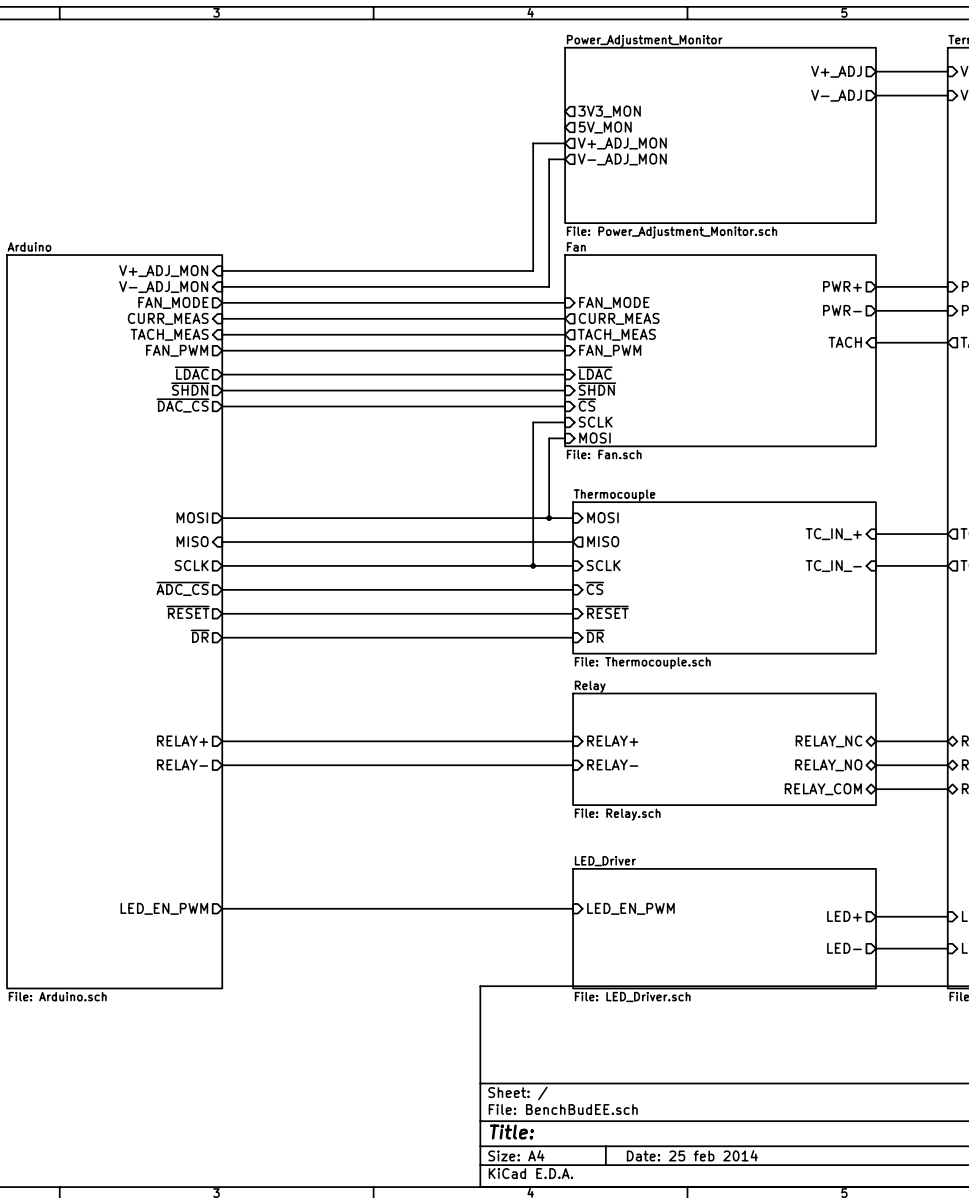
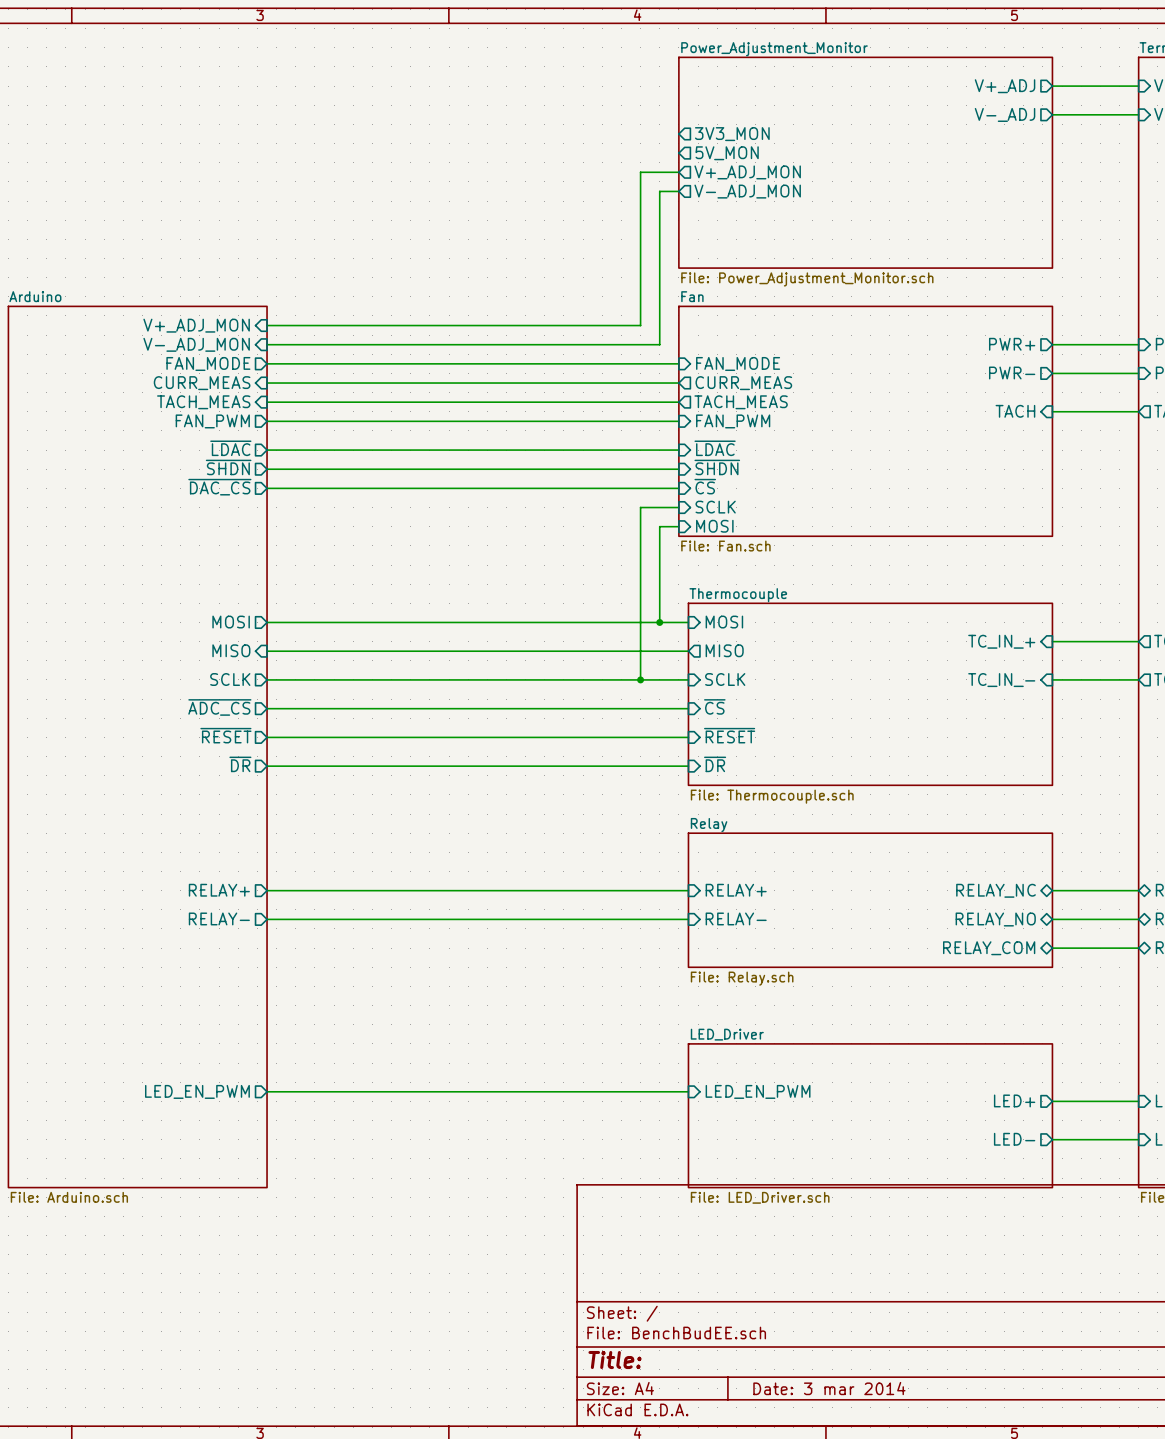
title block: Date: 25 feb 2014 (692, 1155) -> Date: 3 mar 2014 (829, 1388)

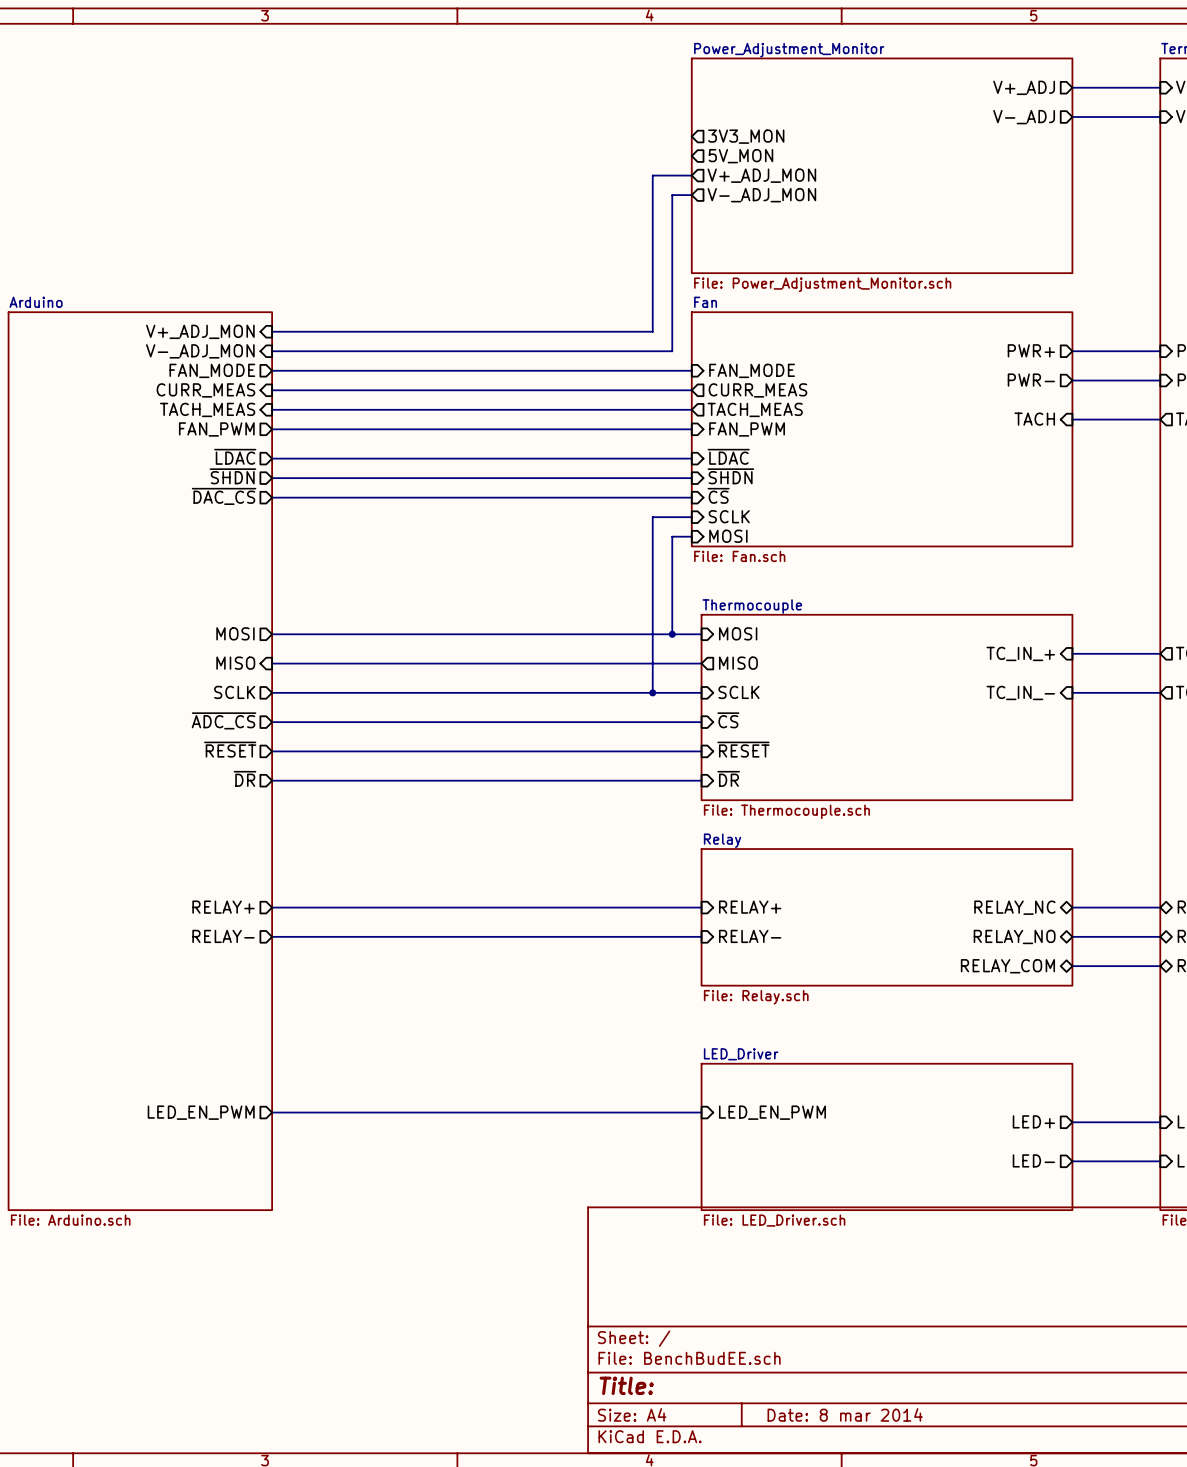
title block: Date: 3 mar 2014 (829, 1388) -> Date: 8 mar 2014 (845, 1414)

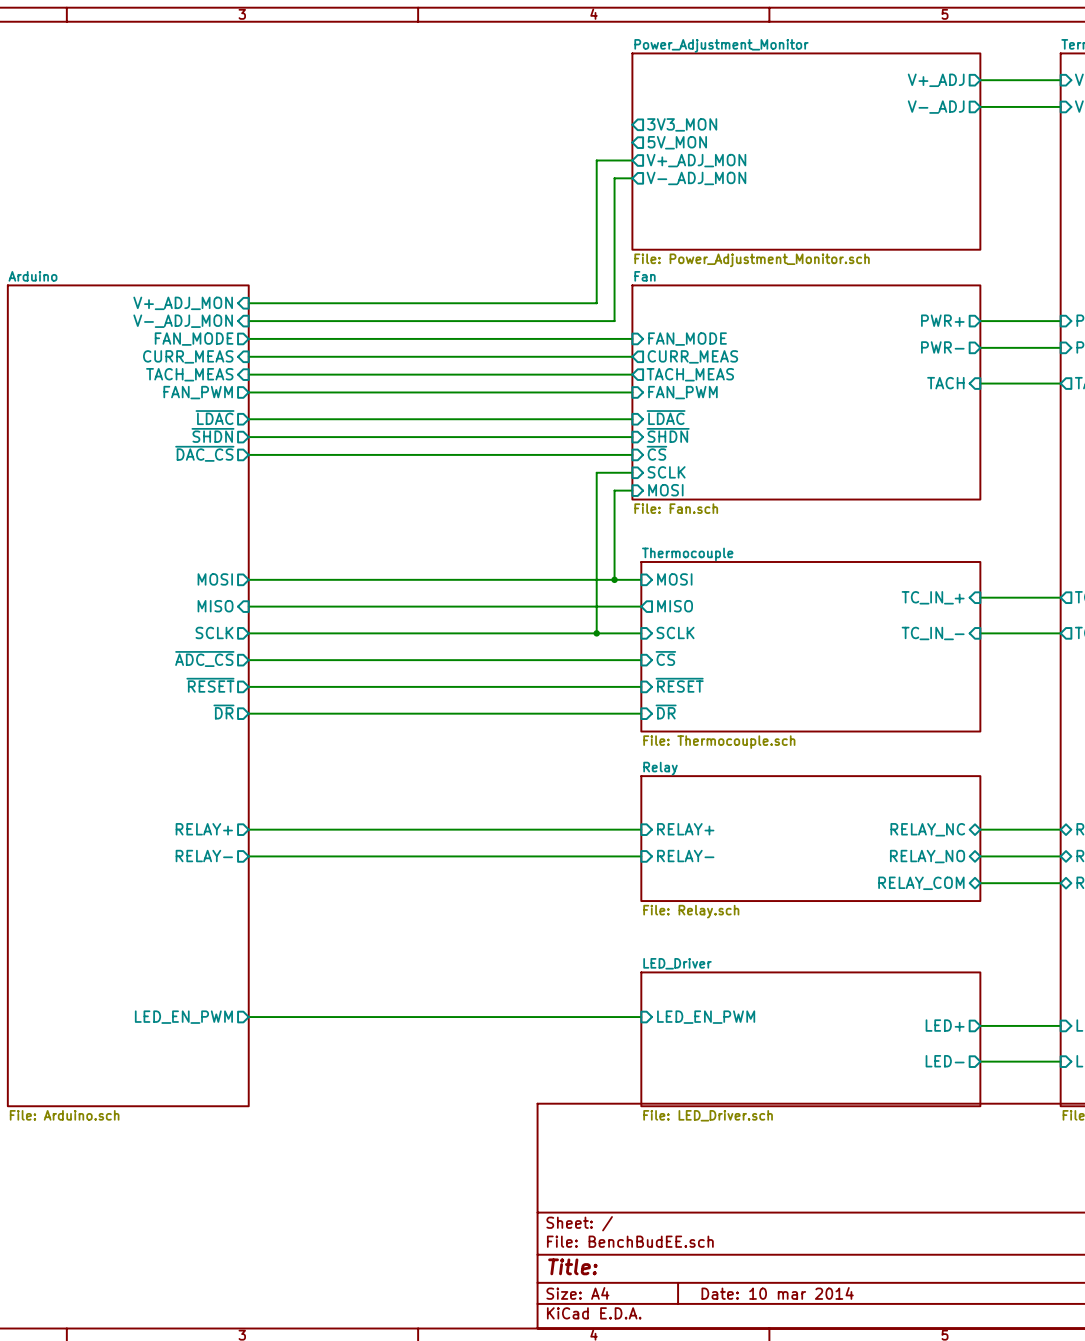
title block: Date: 8 mar 2014 (845, 1414) -> Date: 10 mar 2014 (777, 1293)

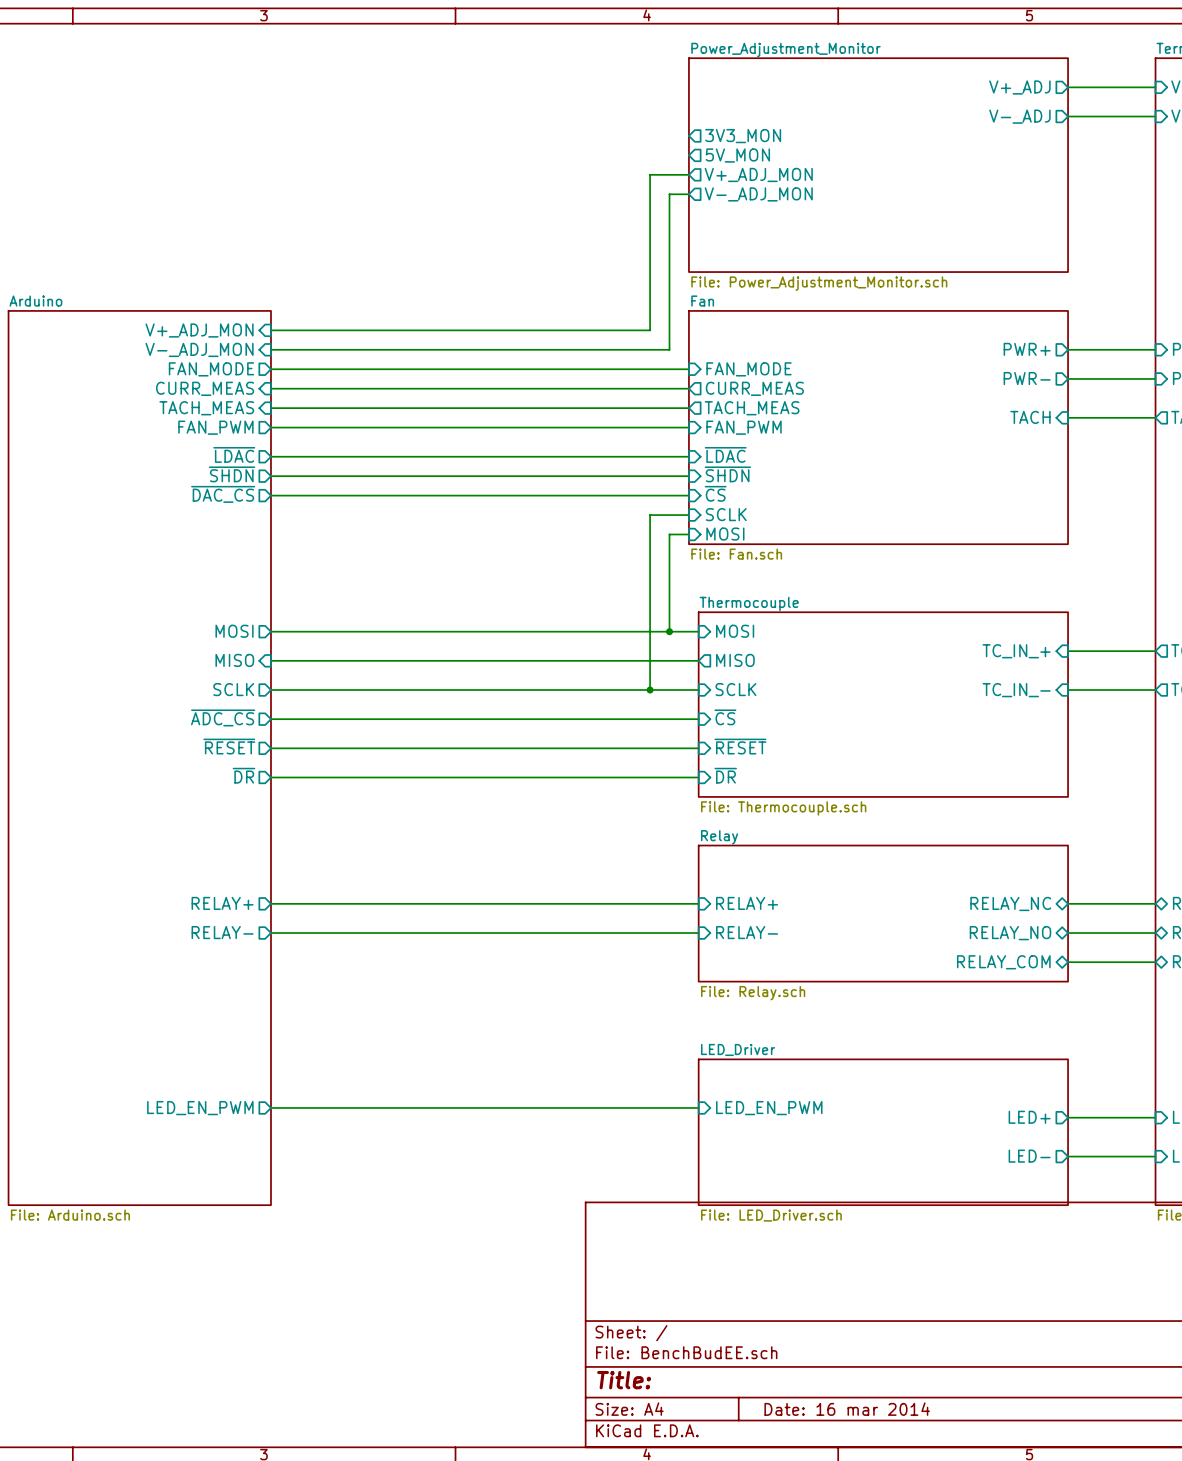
title block: Date: 10 mar 2014 (777, 1293) -> Date: 16 mar 2014 (847, 1409)

